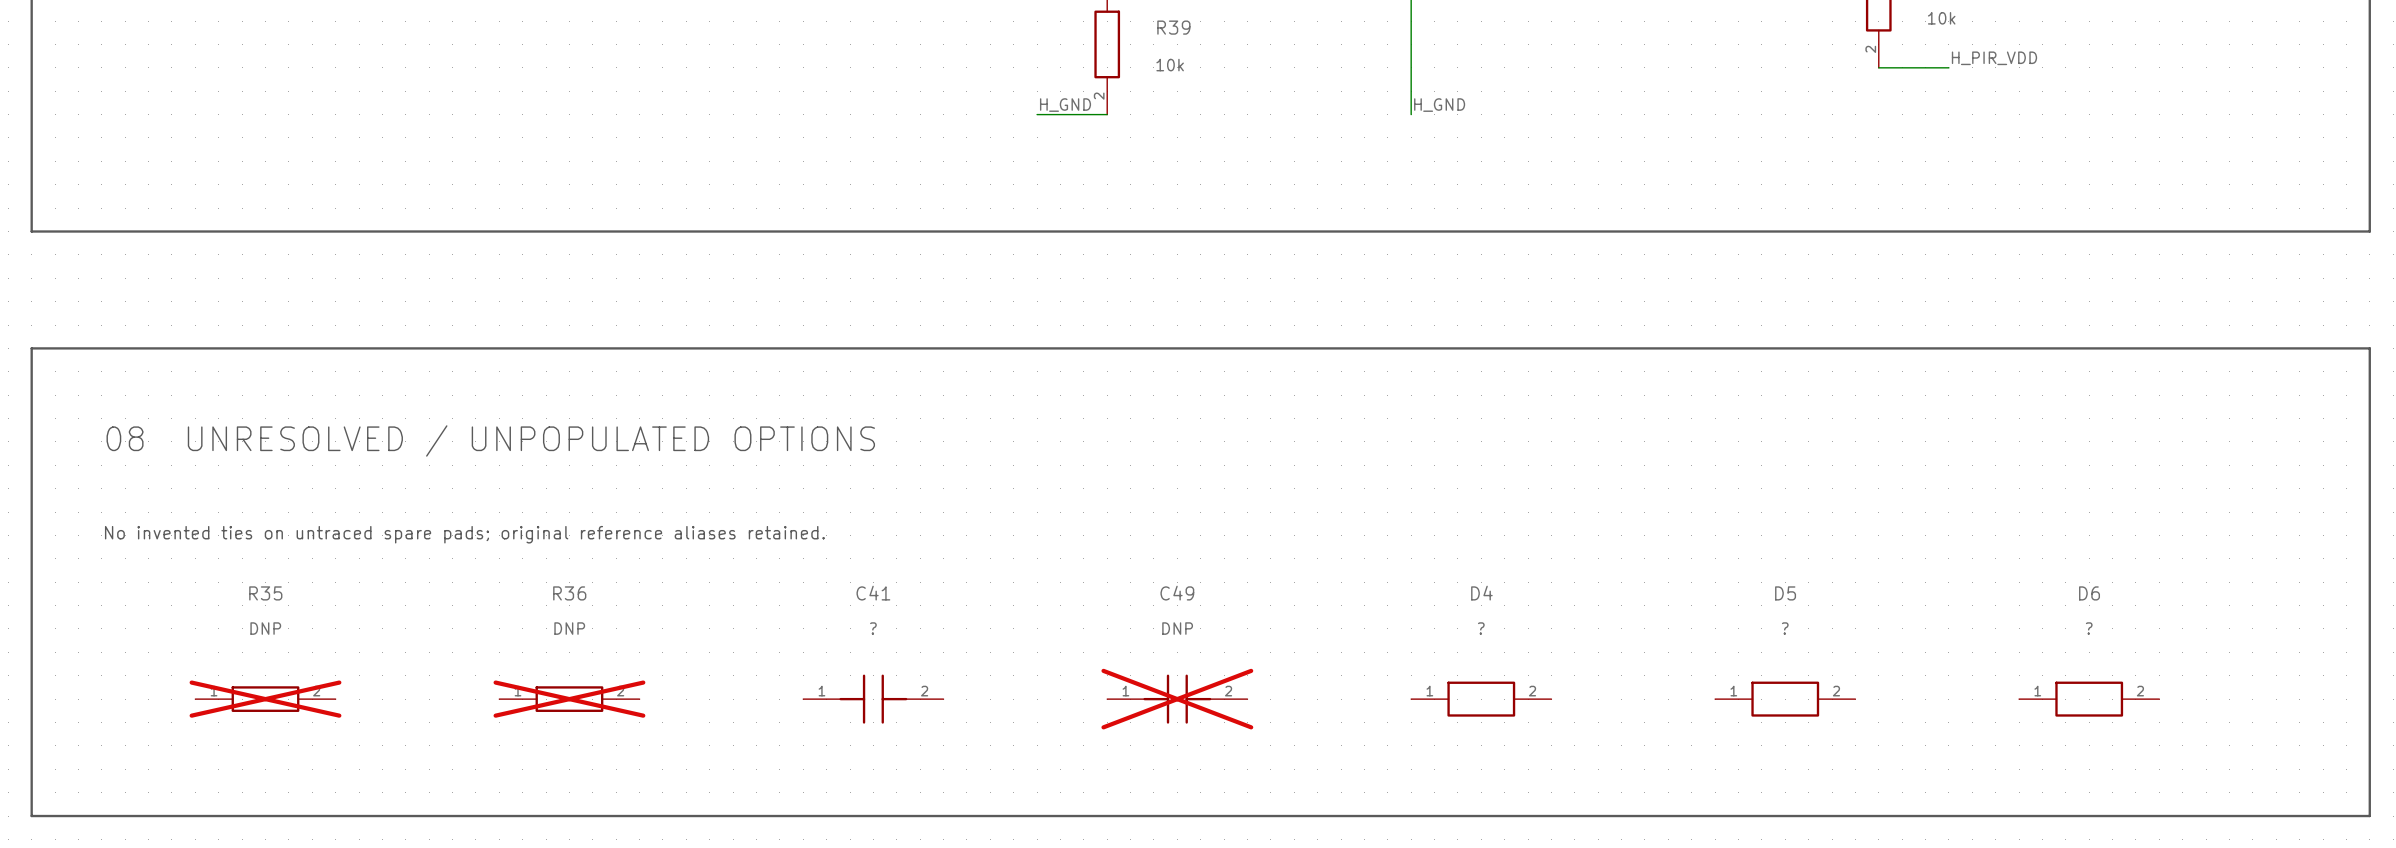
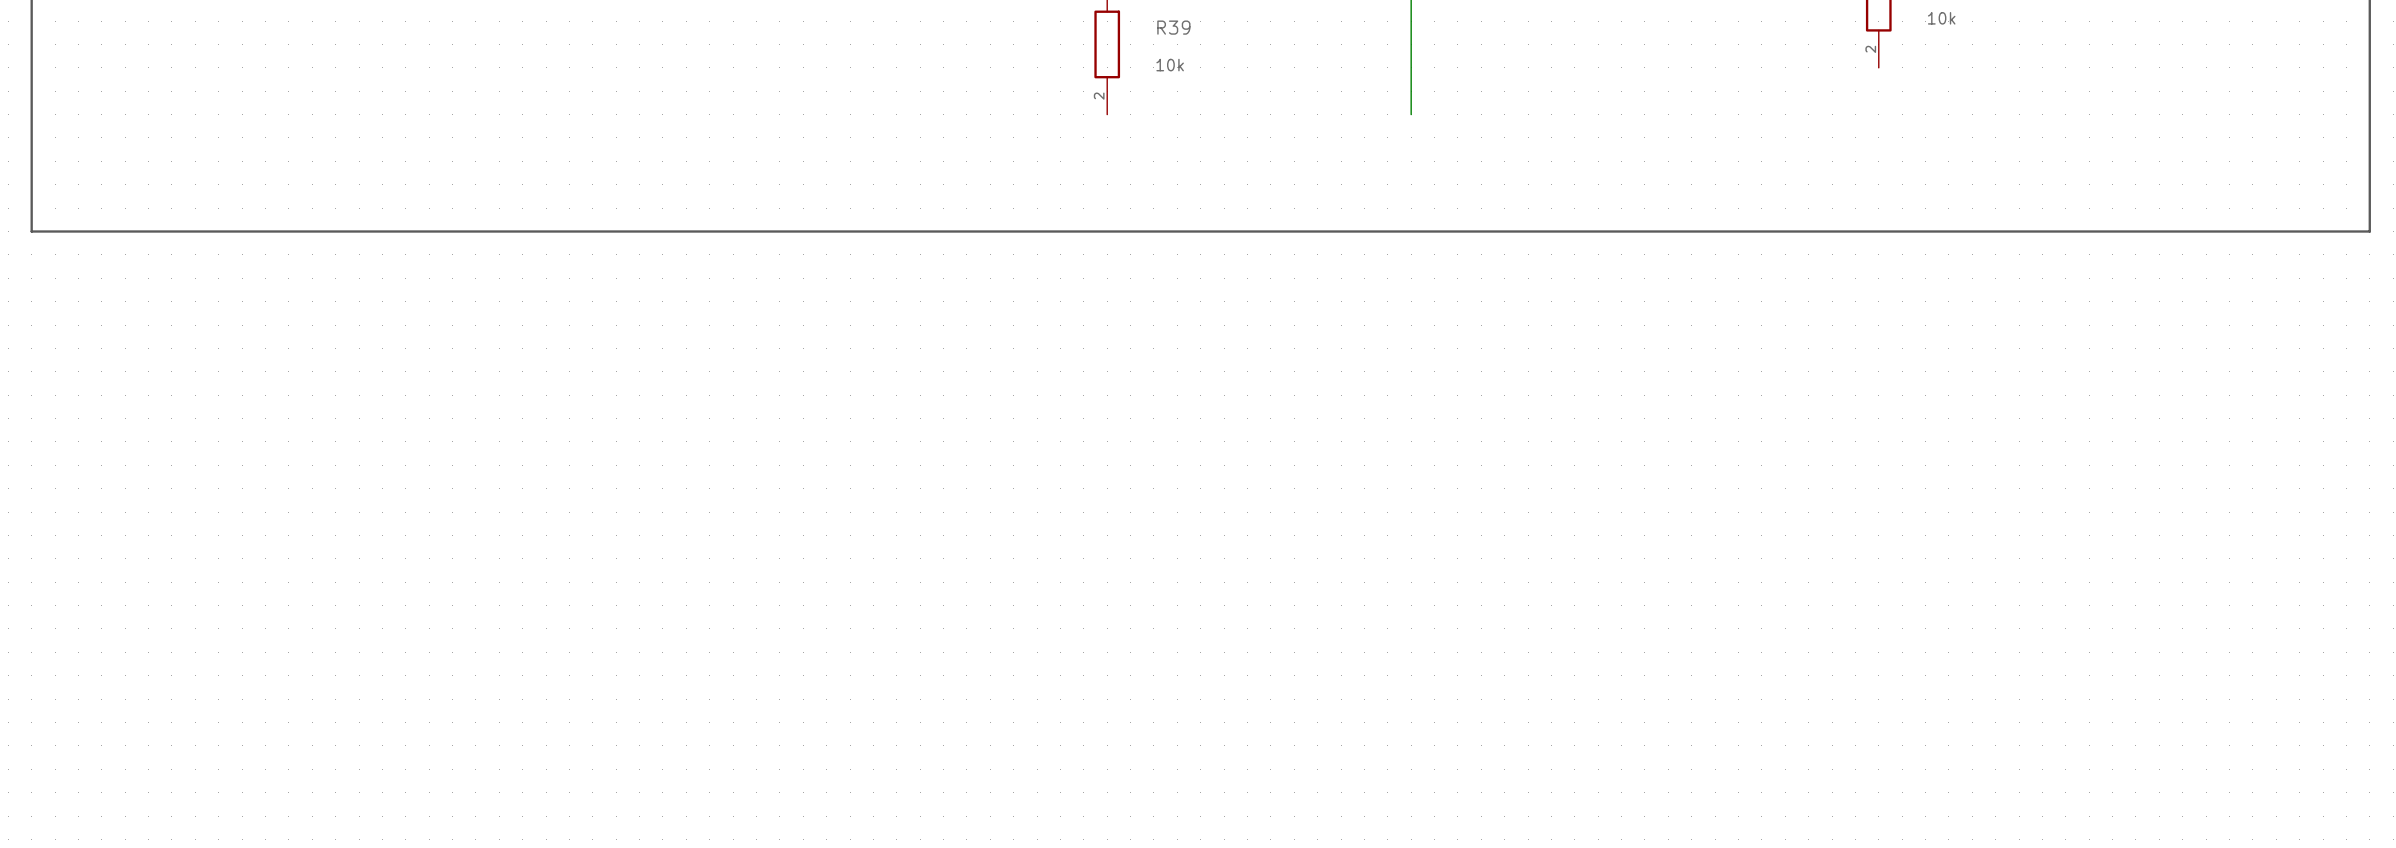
label: H_PIR_VDD (1994, 58) -> none
wire: (1878, 67) (1948, 67) -> none
label: H_GND (1065, 105) -> none
label: H_GND (1439, 105) -> none
wire: (1037, 114) (1107, 114) -> none
line: (31, 348) (31, 816) (2369, 816) (2369, 348) (31, 348) -> none
text: 08 UNRESOLVED / UNPOPULATED OPTIONS (490, 440) -> none
text: No invented ties on untraced spare pads; original reference aliases retained. (464, 534) -> none
R35: DNP (265, 699) -> none
R36: DNP (569, 699) -> none
C41: ? (873, 699) -> none
C49: DNP (1177, 699) -> none
D4: ? (1481, 699) -> none
D5: ? (1785, 699) -> none
D6: ? (2089, 699) -> none

